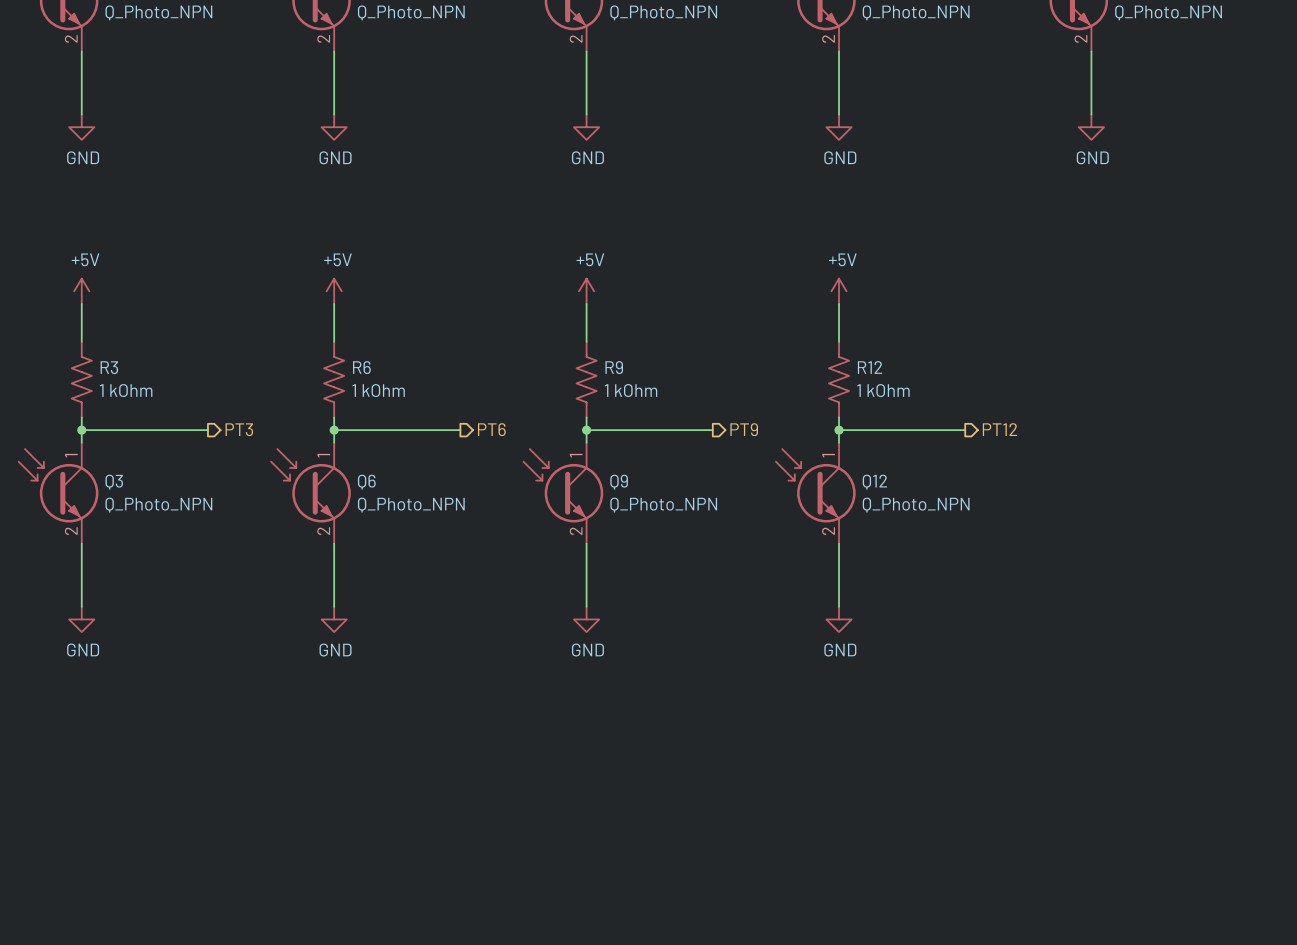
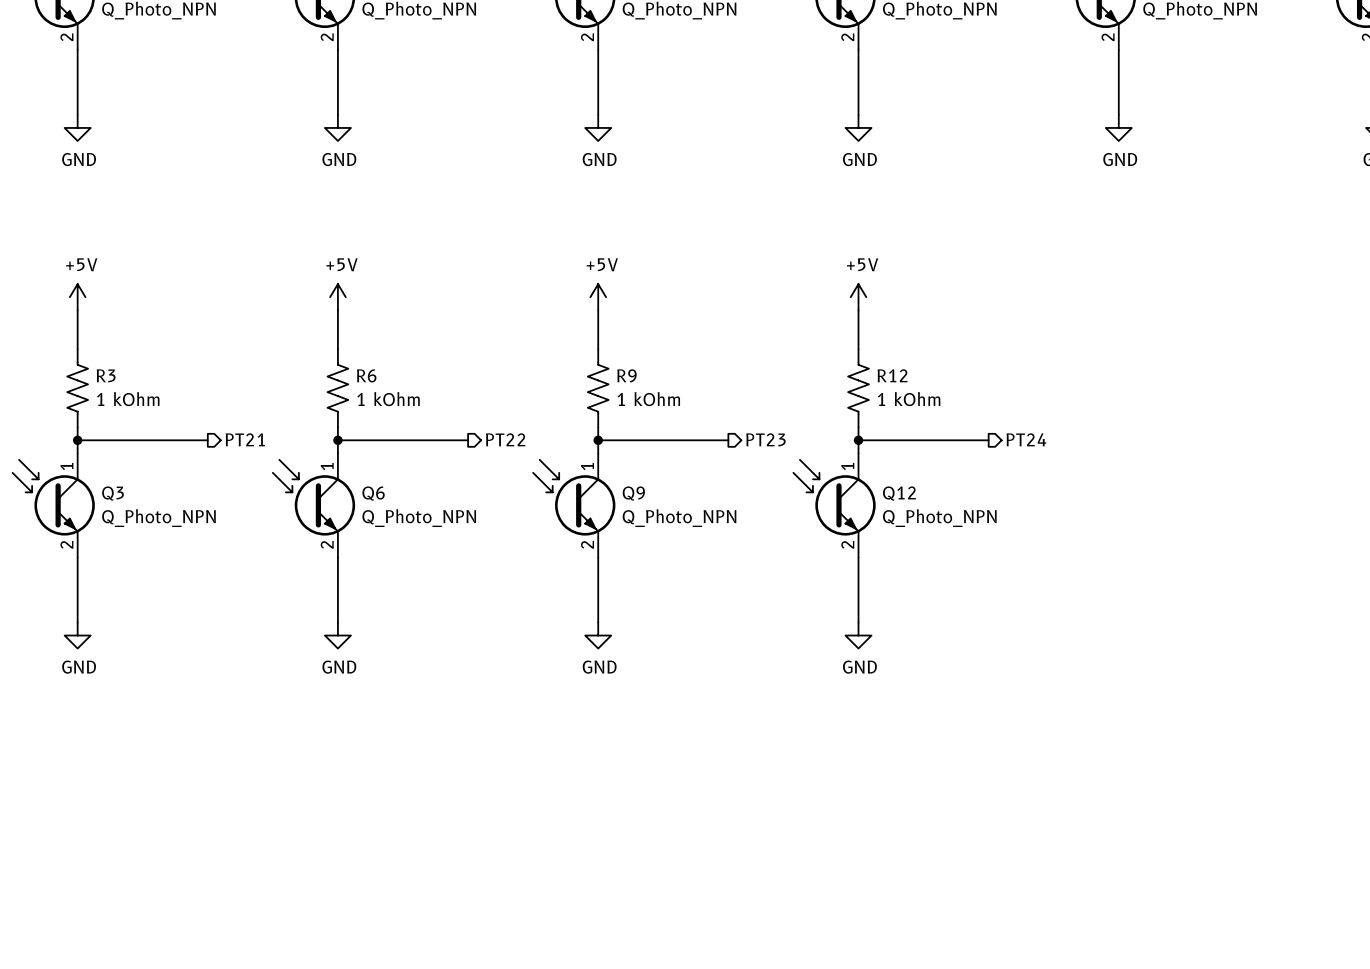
hierarchical label: PT3 (239, 429) -> PT21 (245, 439)
hierarchical label: PT6 (491, 429) -> PT22 (505, 439)
hierarchical label: PT9 (744, 429) -> PT23 (765, 439)
hierarchical label: PT12 (999, 429) -> PT24 (1026, 439)

